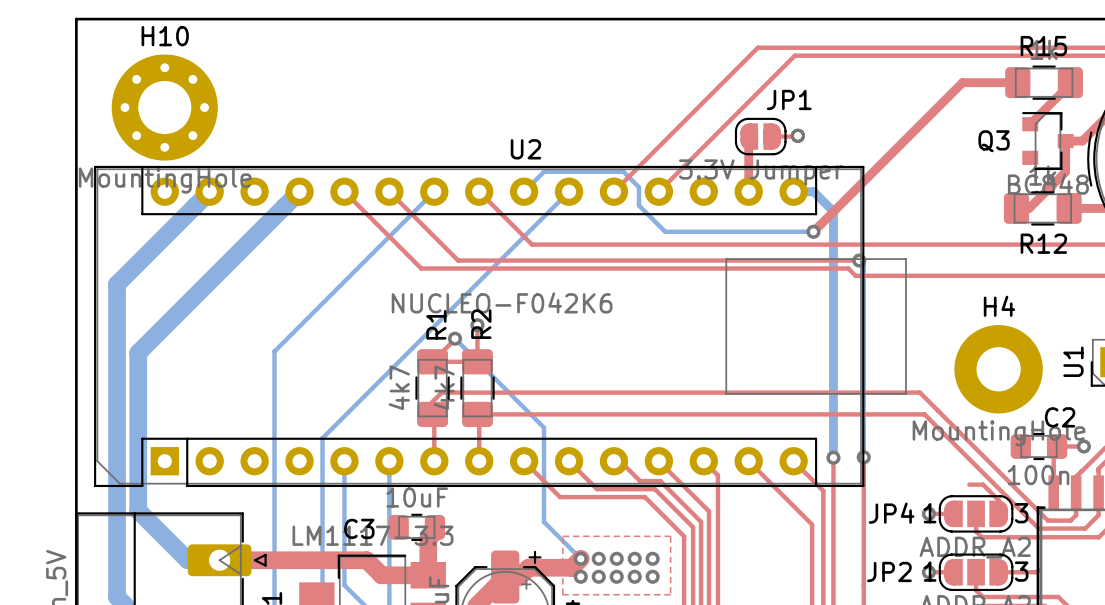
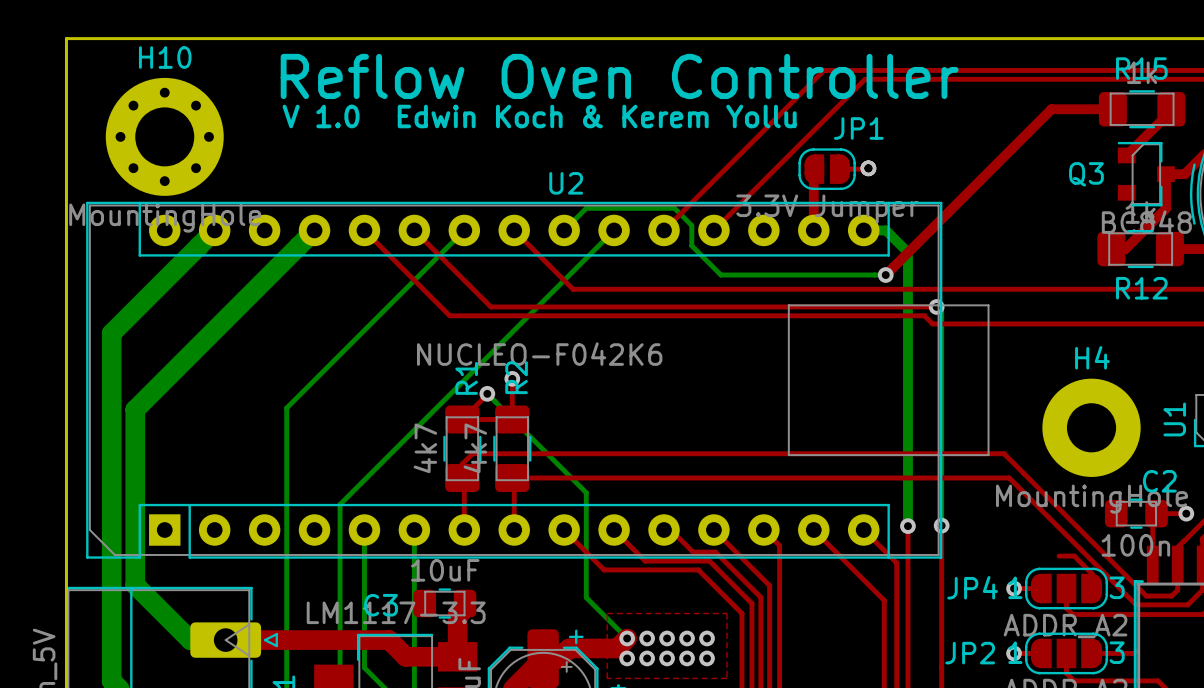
text: none -> Reflow Oven Controller (619, 76)
text: none -> V 1.0 (321, 116)
text: none -> Edwin Koch & Kerem Yollu (597, 116)

